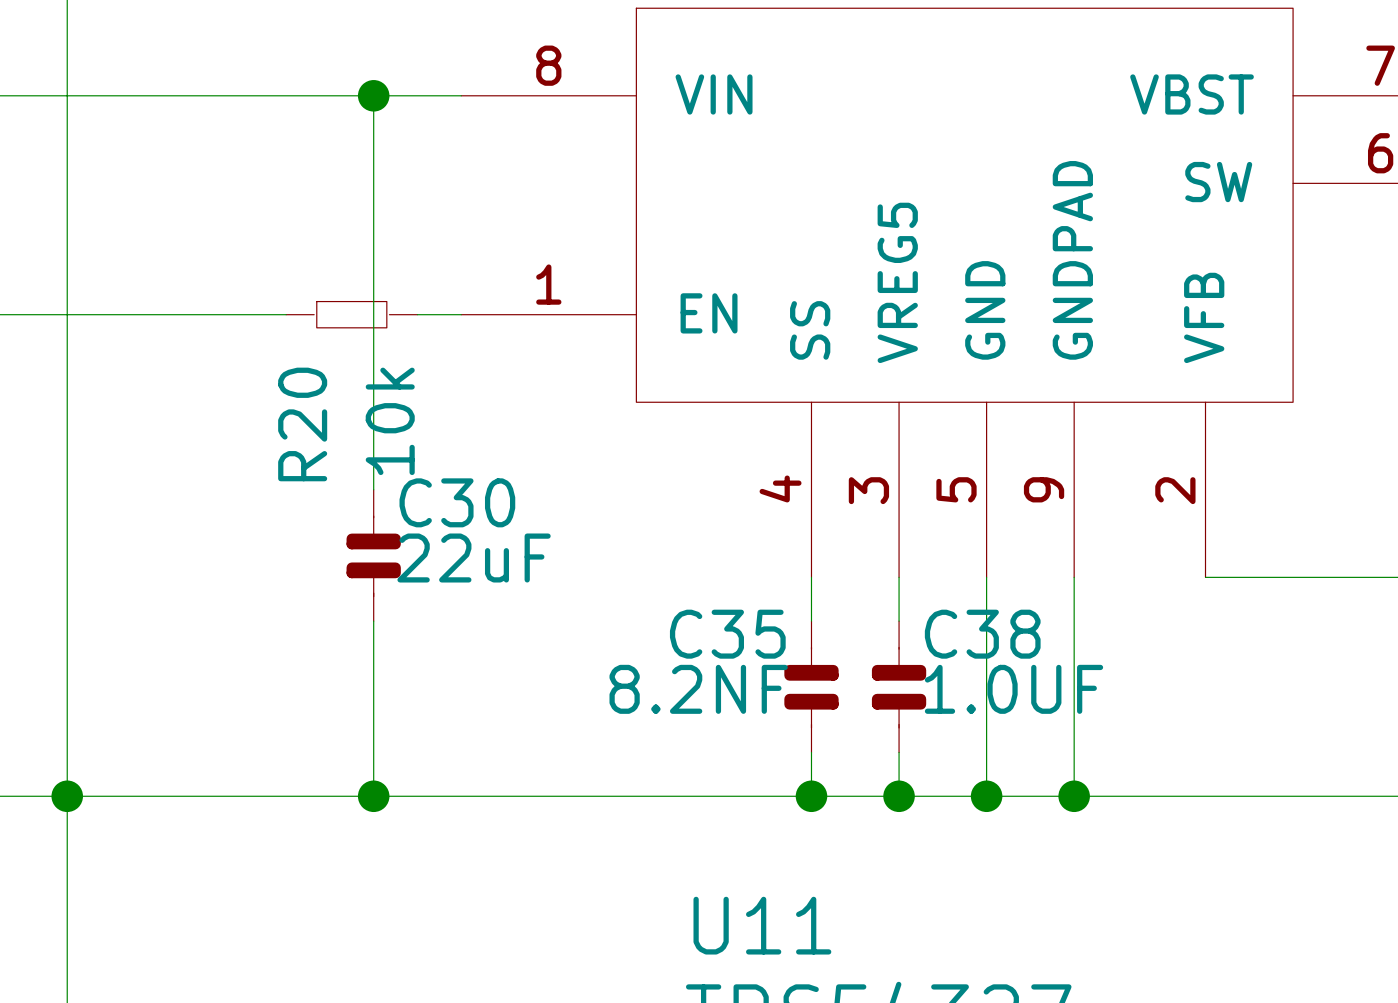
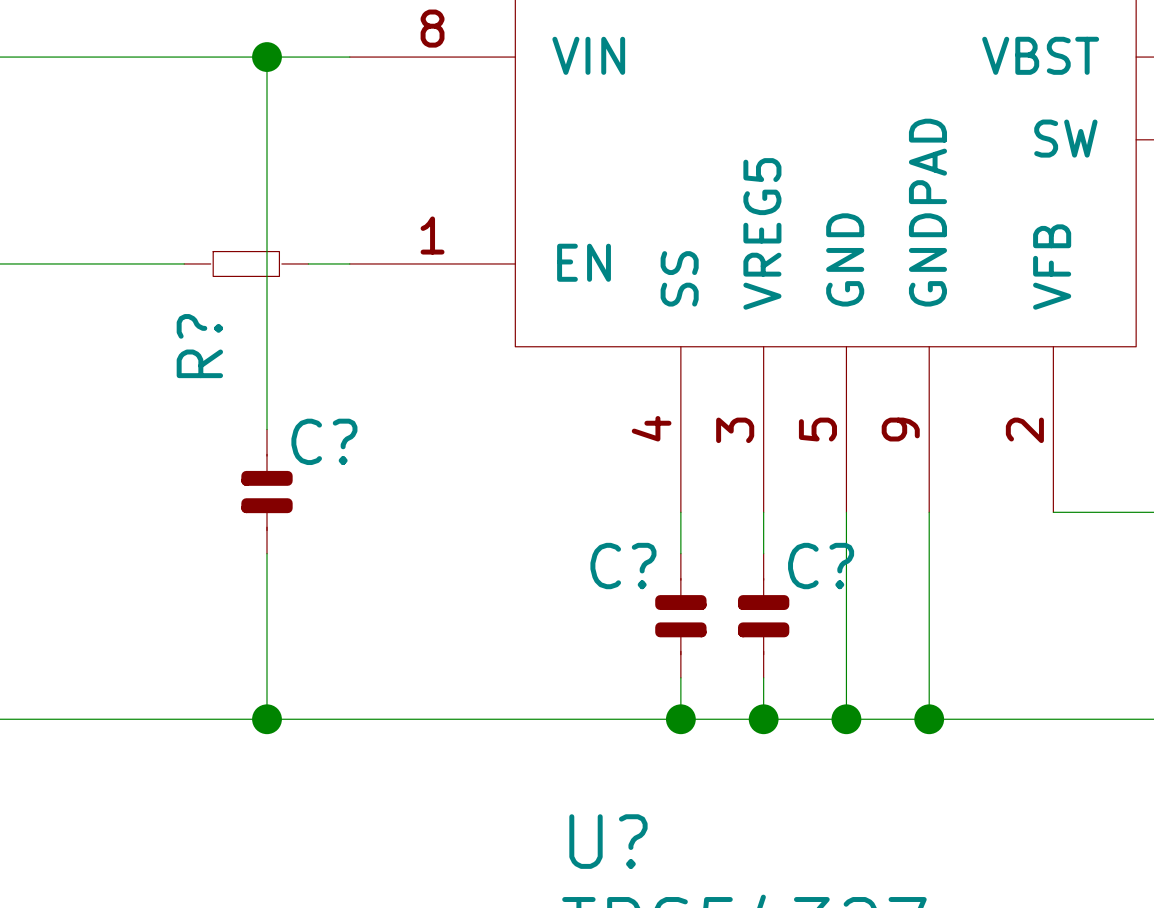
R20 value: 10k (390, 421) -> none
R20 name: R20 (302, 424) -> R? (199, 346)
C30 name: C30 (457, 502) -> C? (324, 441)
C30 value: 22uF (474, 558) -> none
C35 name: C35 (727, 634) -> C? (623, 566)
C38 name: C38 (982, 634) -> C? (821, 566)
C35 value: 8.2NF (698, 689) -> none
C38 value: 1.0UF (1013, 689) -> none
U11 name: U11 (762, 925) -> U? (608, 841)

